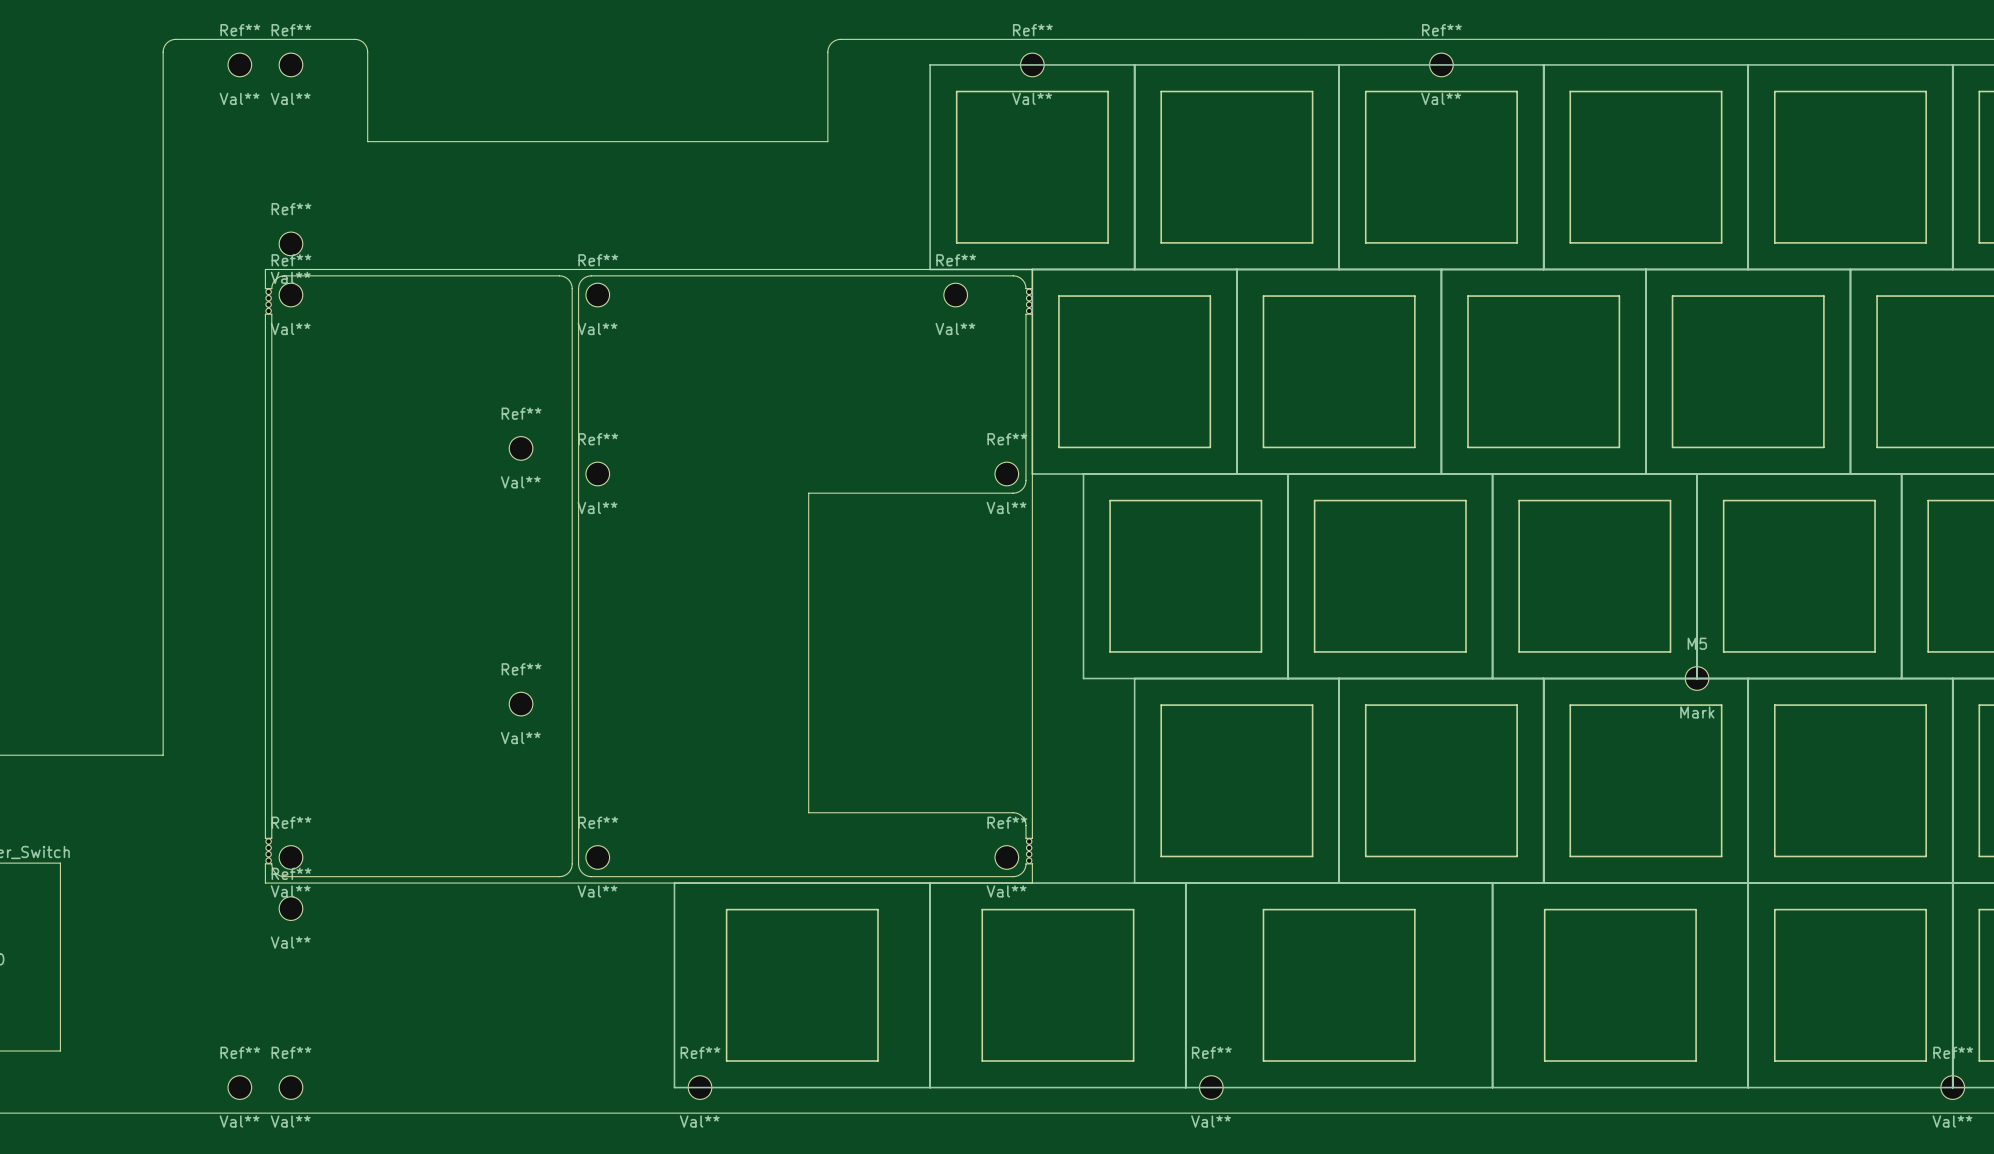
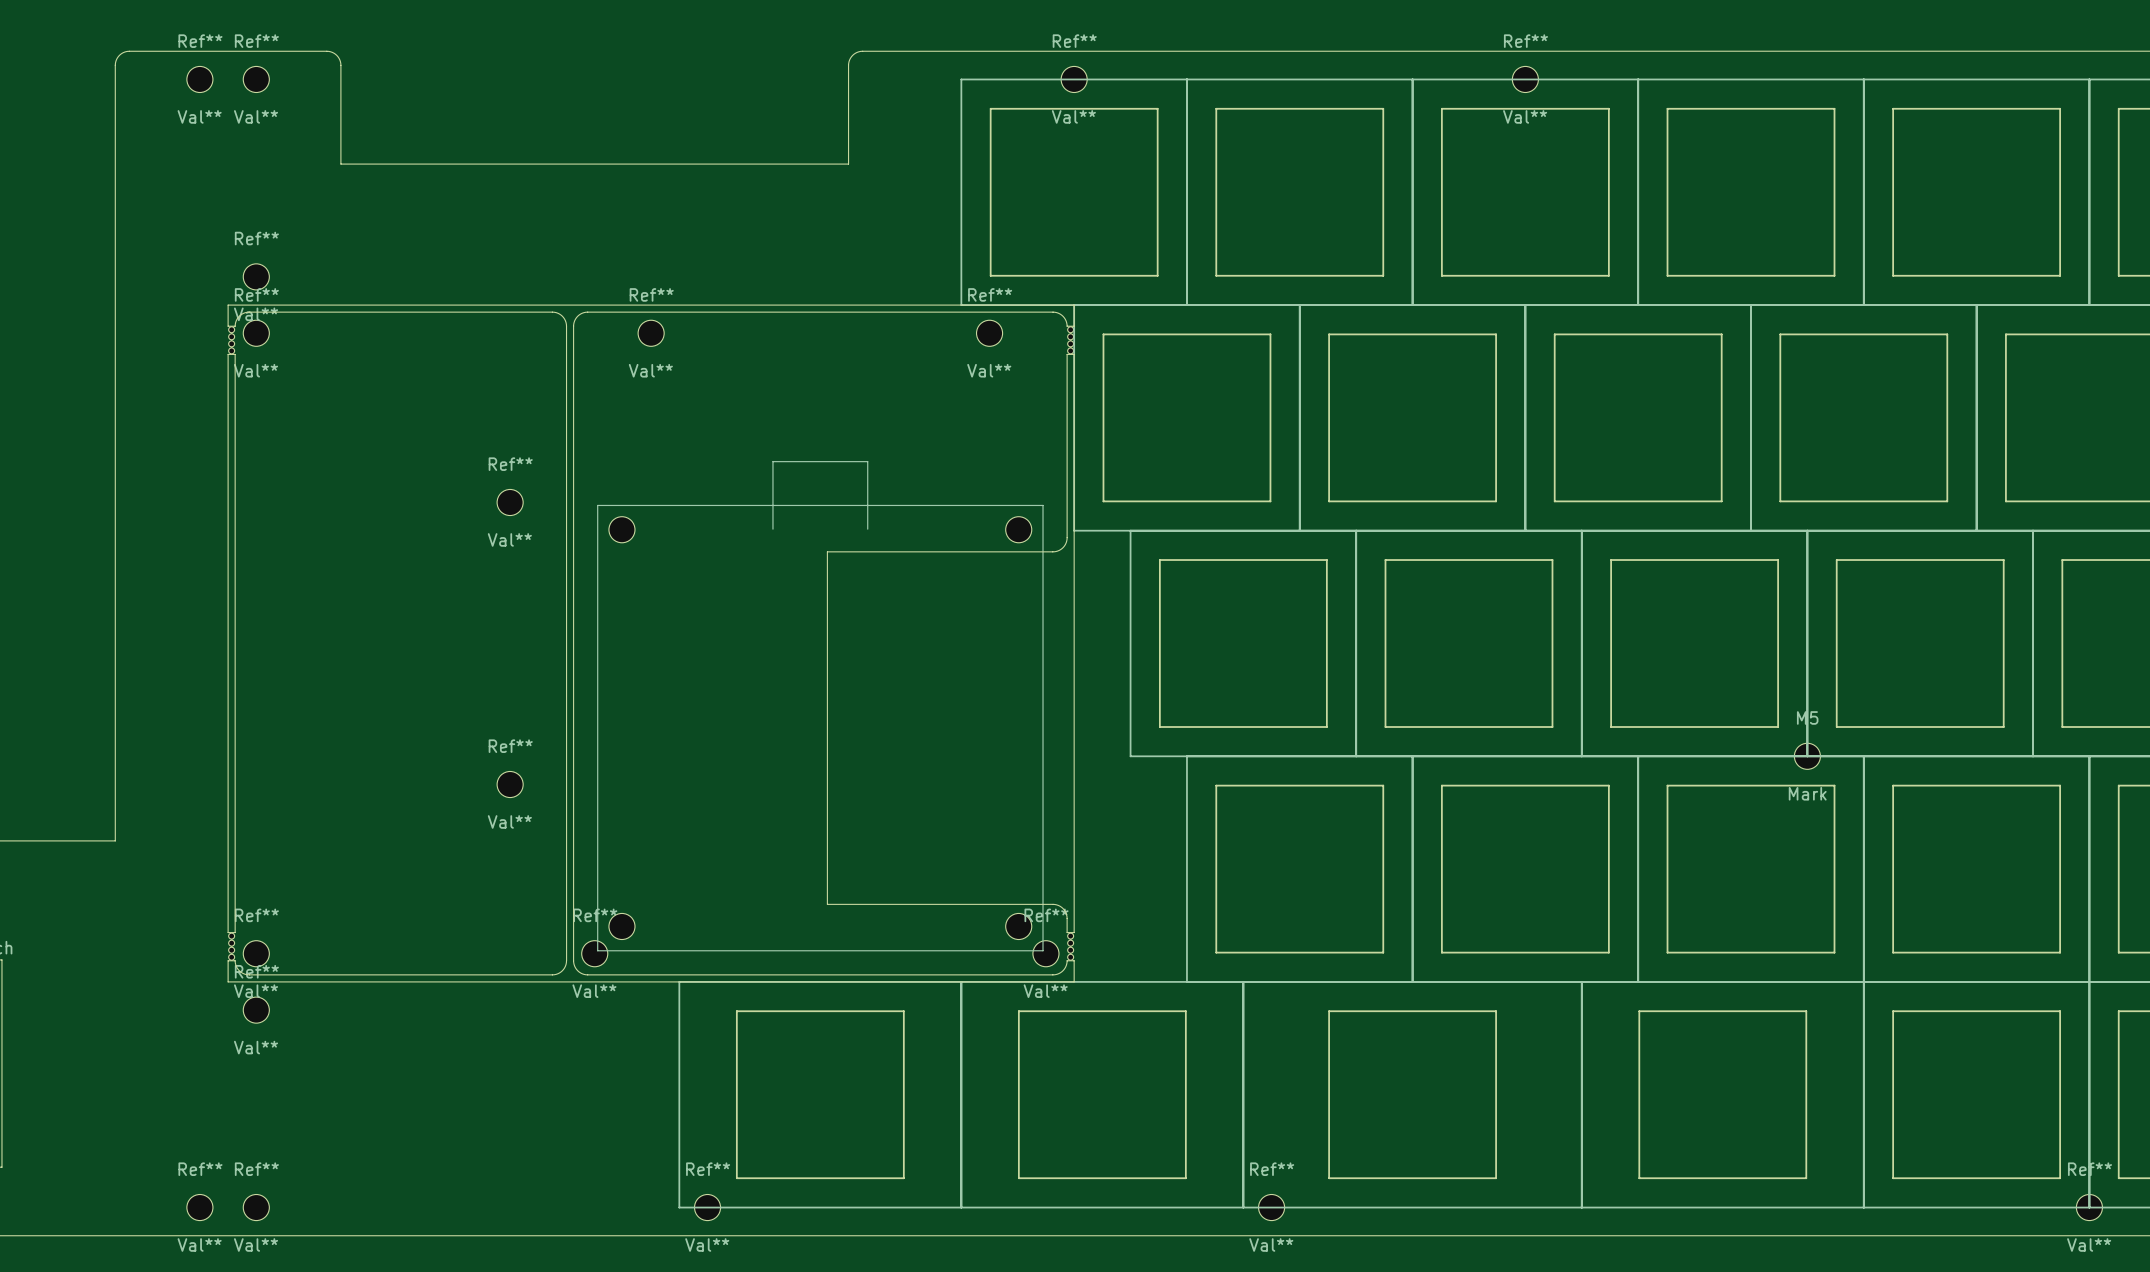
Ref** position: (597, 295) -> (651, 333)
Ref**: Val** (597, 473) -> none
Ref**: Val** (1006, 473) -> none
part: none -> (820, 706)

